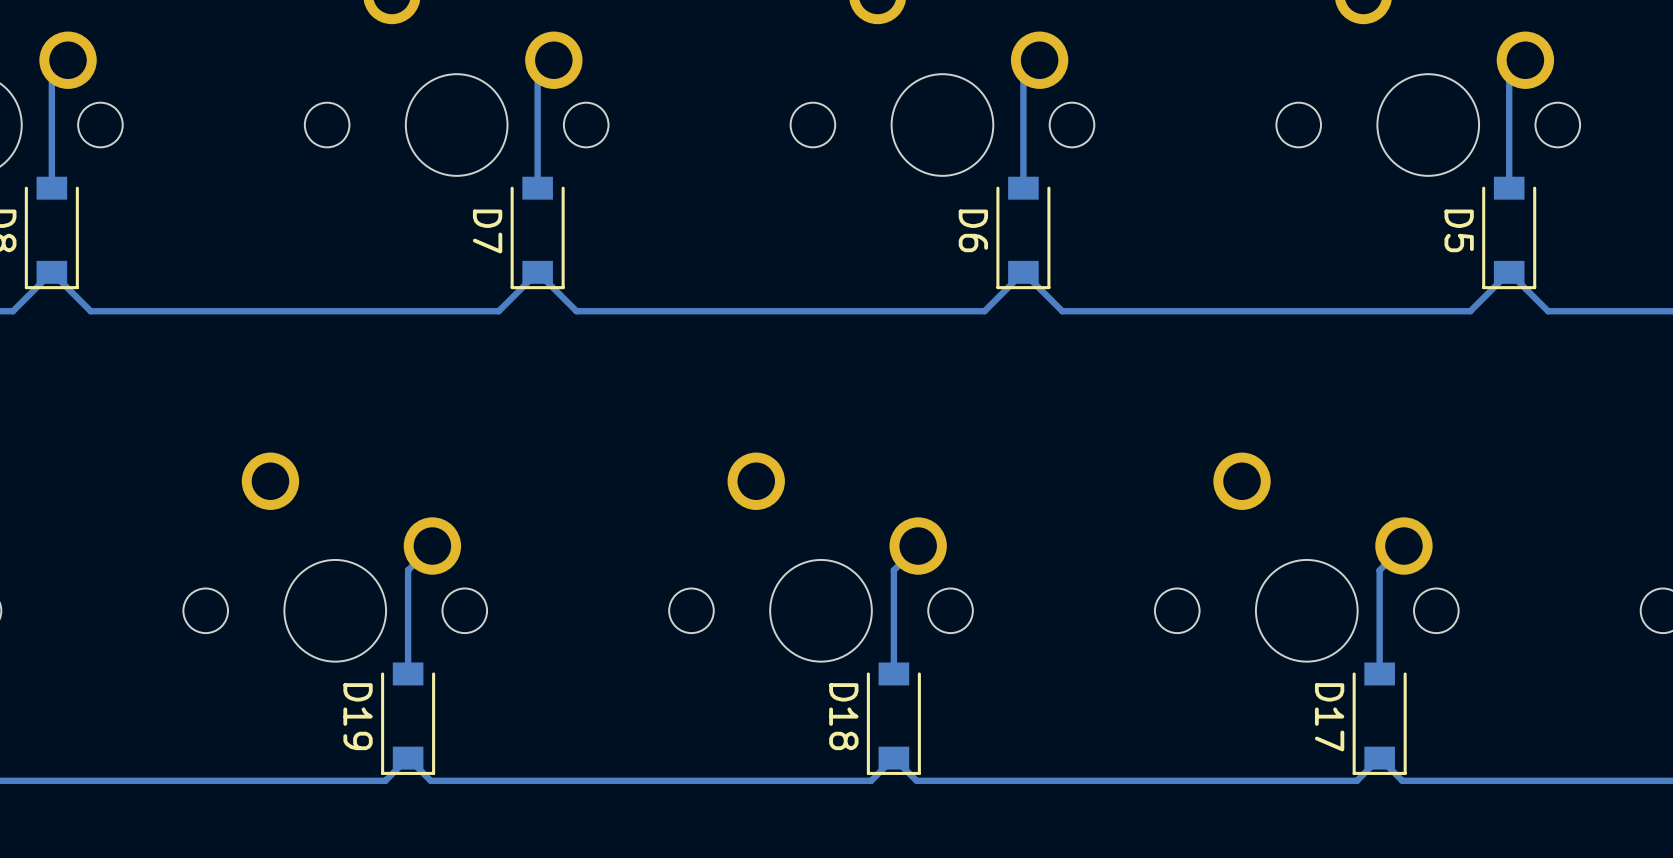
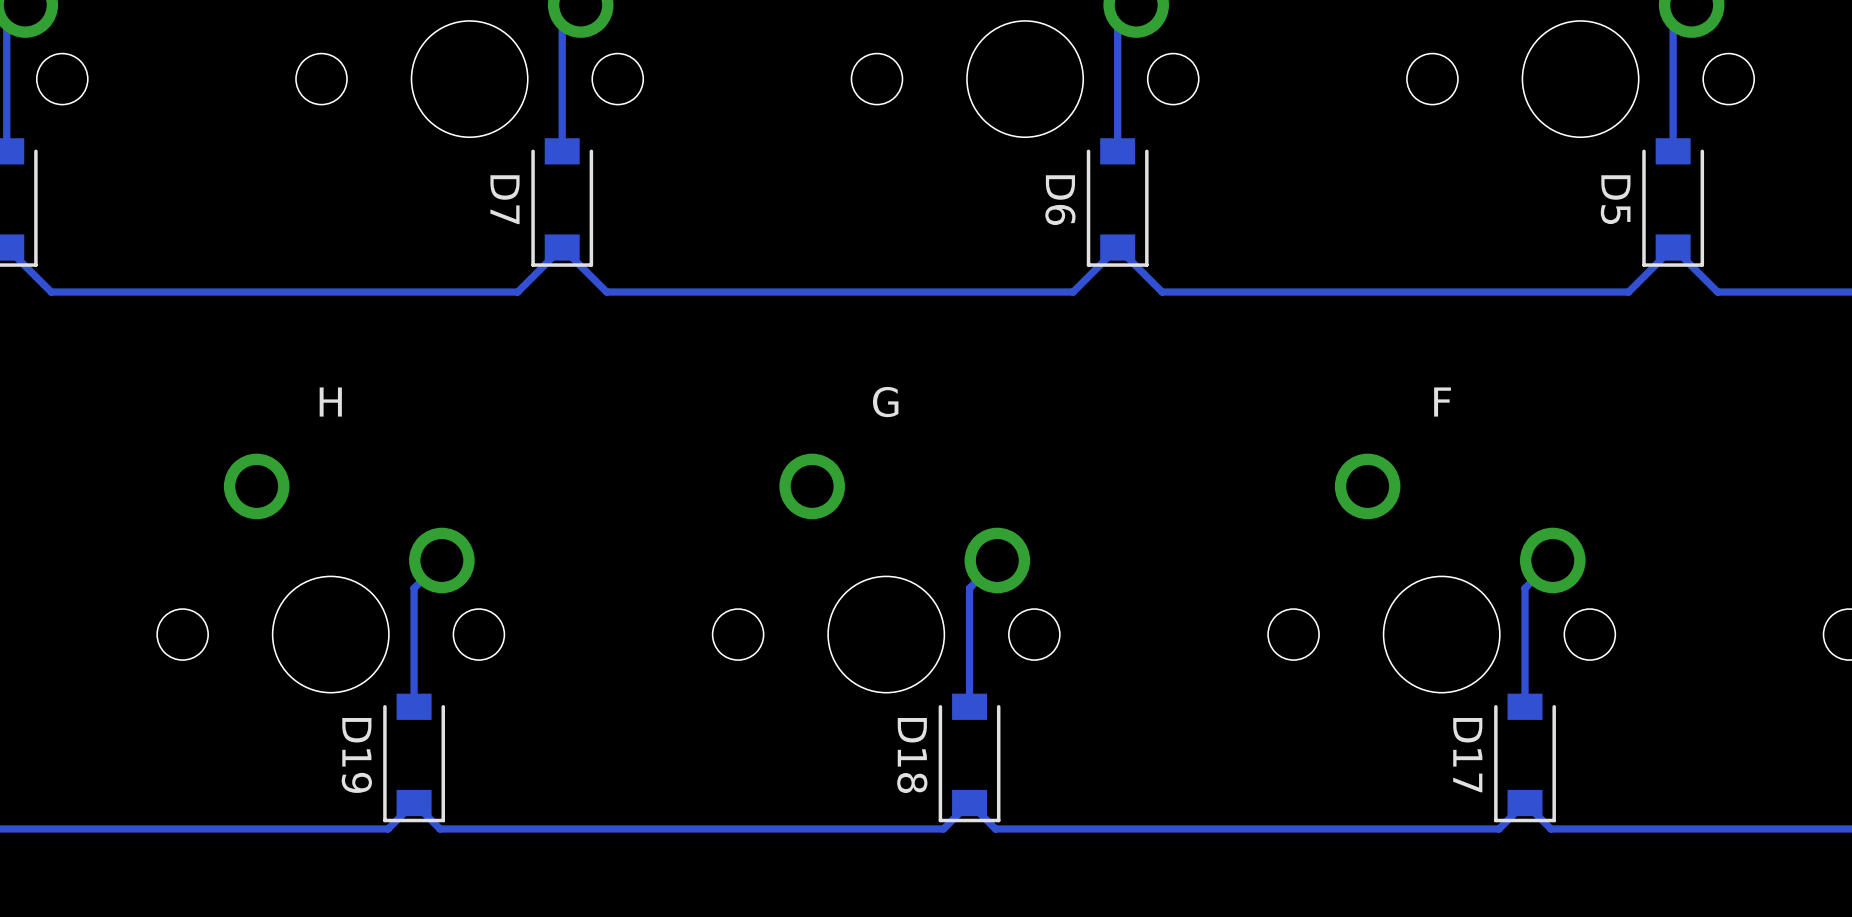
part value: none -> H (330, 402)
part value: none -> G (885, 402)
part value: none -> F (1442, 402)

